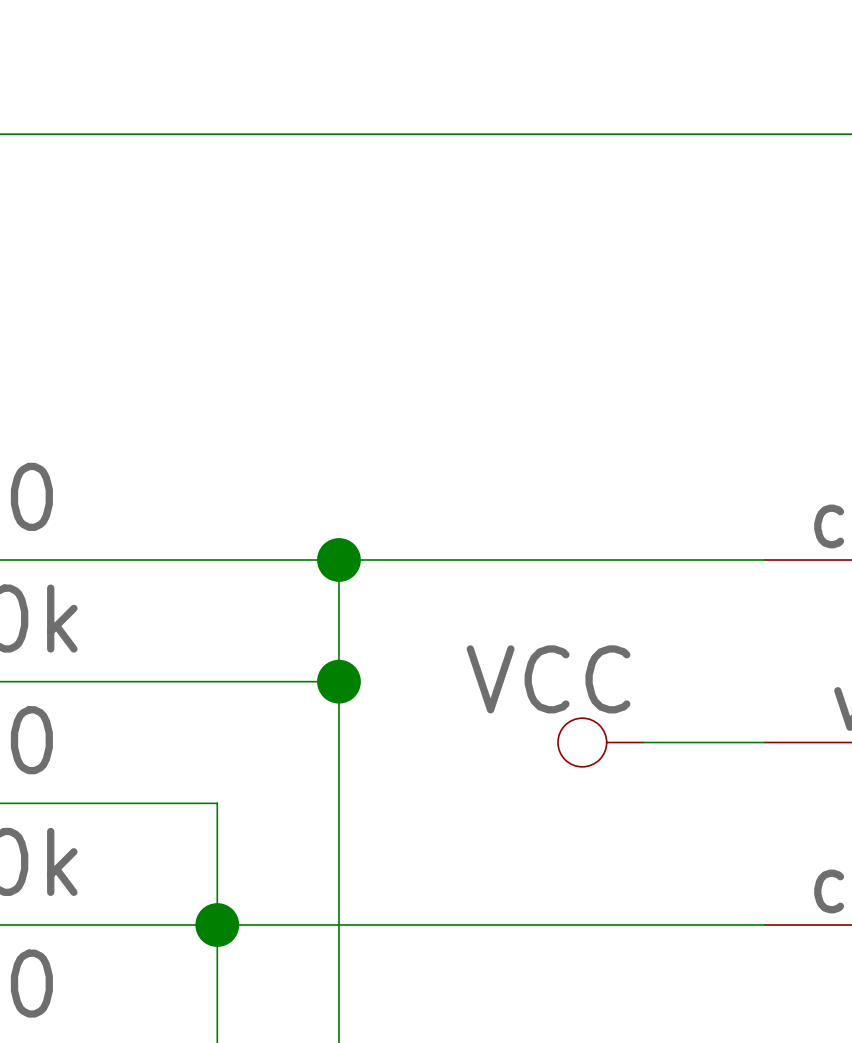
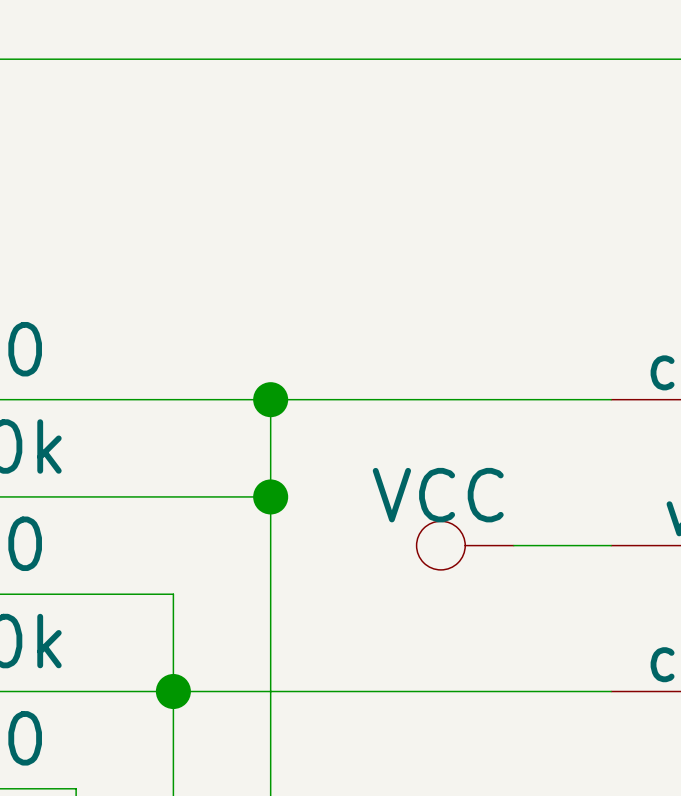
power symbol shape: [557, 718, 644, 767] -> [416, 521, 514, 570]

